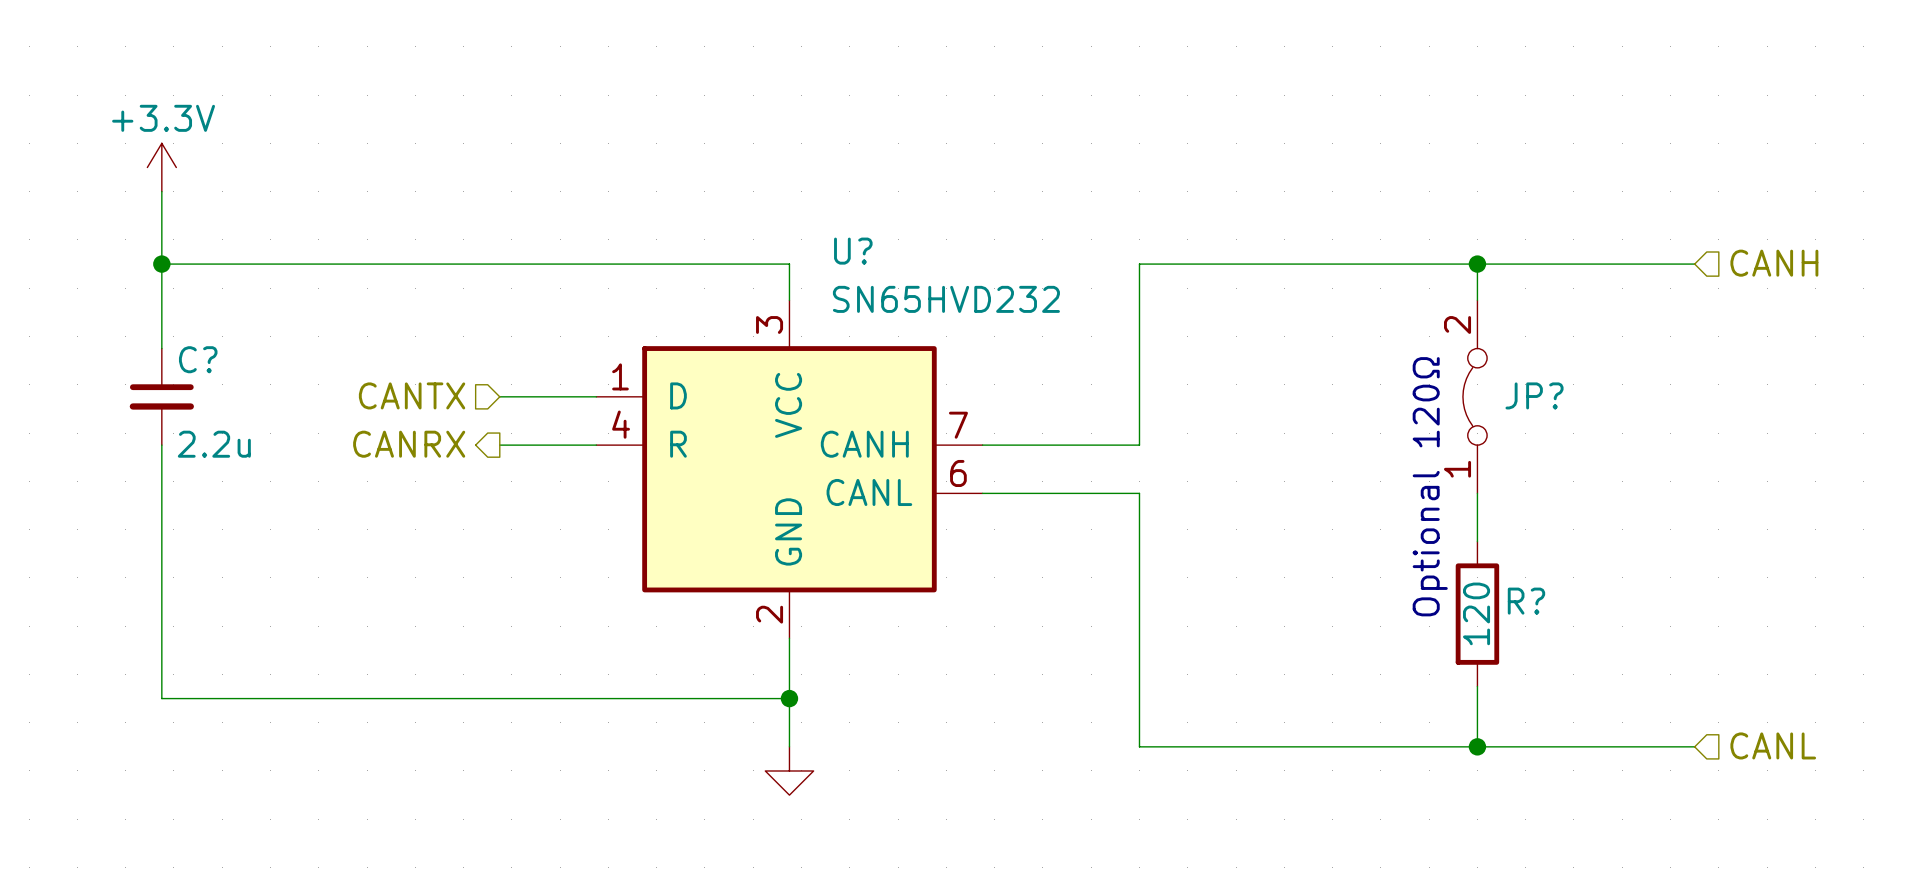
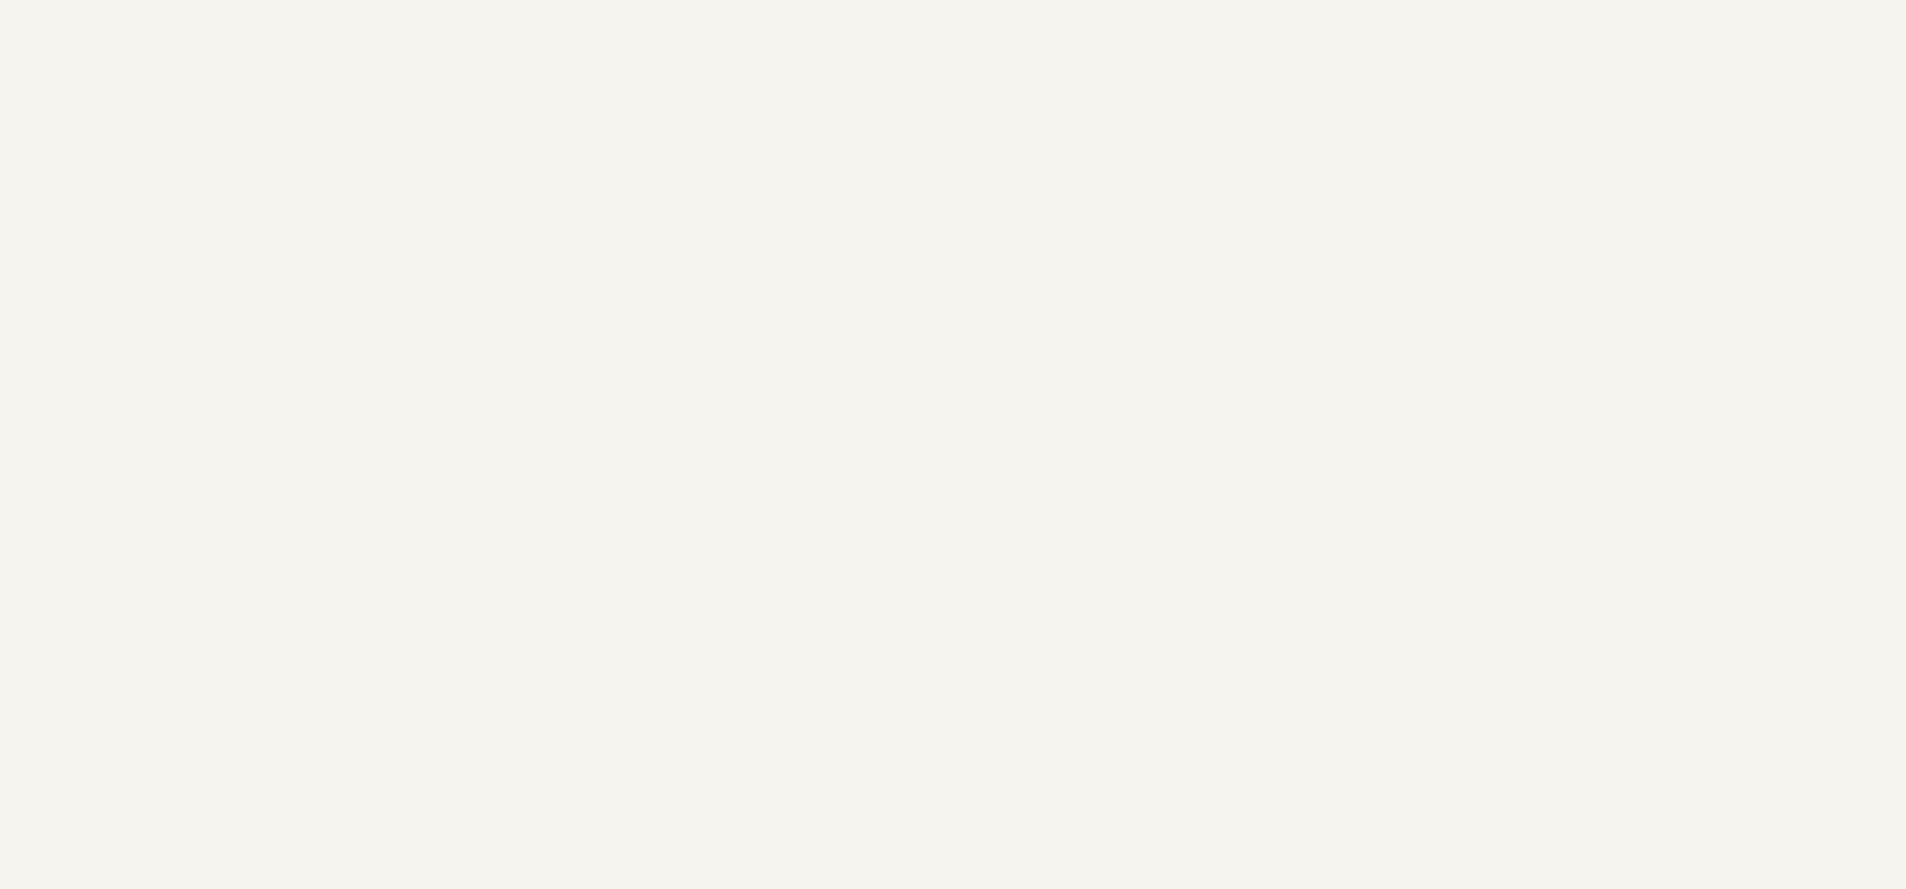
power symbol: +3.3V (161, 167) -> none
wire: (161, 191) (161, 348) -> none
hierarchical label: CANH (1774, 263) -> none
wire: (161, 264) (789, 264) (789, 300) -> none
junction: (161, 264) -> none
wire: (1477, 264) (1477, 300) -> none
junction: (1477, 264) -> none
wire: (1694, 264) (1139, 264) (1139, 445) (982, 445) -> none
hierarchical label: CANTX (412, 395) -> none
C?: 2.2u (161, 396) -> none
wire: (499, 396) (596, 396) -> none
JP?: (1475, 396) -> none
hierarchical label: CANRX (409, 444) -> none
wire: (161, 445) (161, 698) (789, 698) -> none
wire: (499, 445) (596, 445) -> none
U?: SN65HVD232 (789, 469) -> none
text: Optional 120Ω (1430, 486) -> none
wire: (982, 493) (1139, 493) (1139, 746) (1694, 746) -> none
wire: (1477, 493) (1477, 541) -> none
R?: 120 (1477, 614) -> none
wire: (789, 638) (789, 746) -> none
wire: (1477, 686) (1477, 746) -> none
junction: (789, 698) -> none
hierarchical label: CANL (1773, 745) -> none
junction: (1477, 746) -> none
power symbol: (789, 770) -> none

